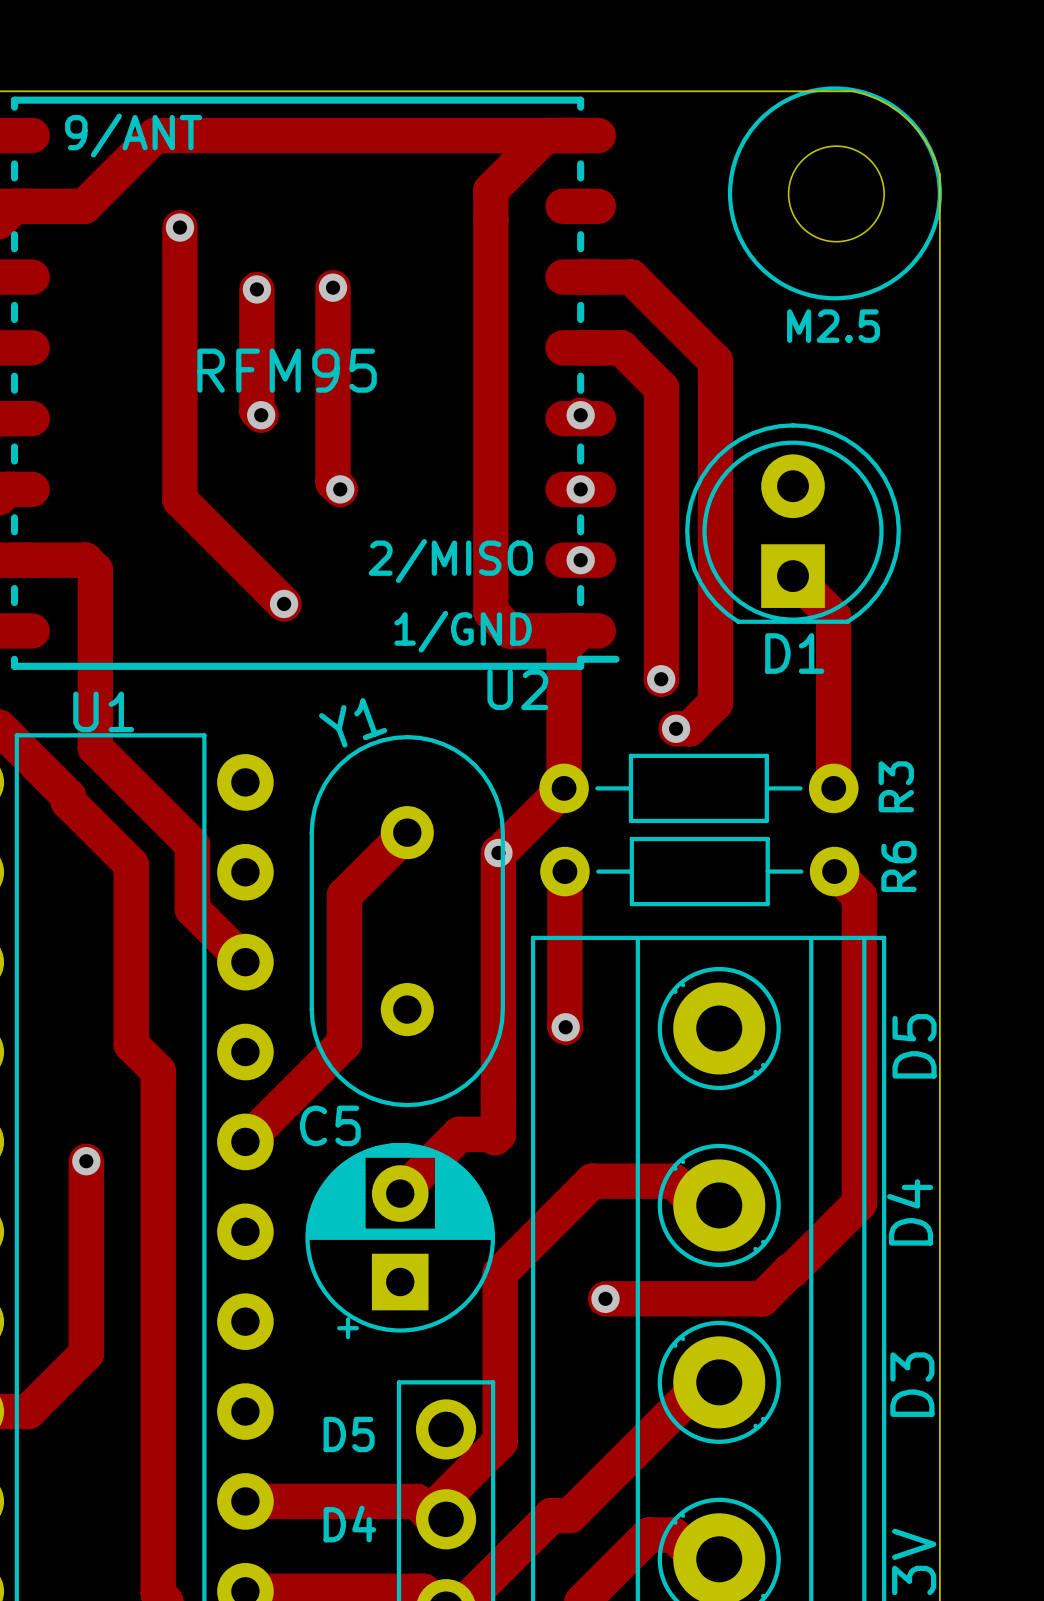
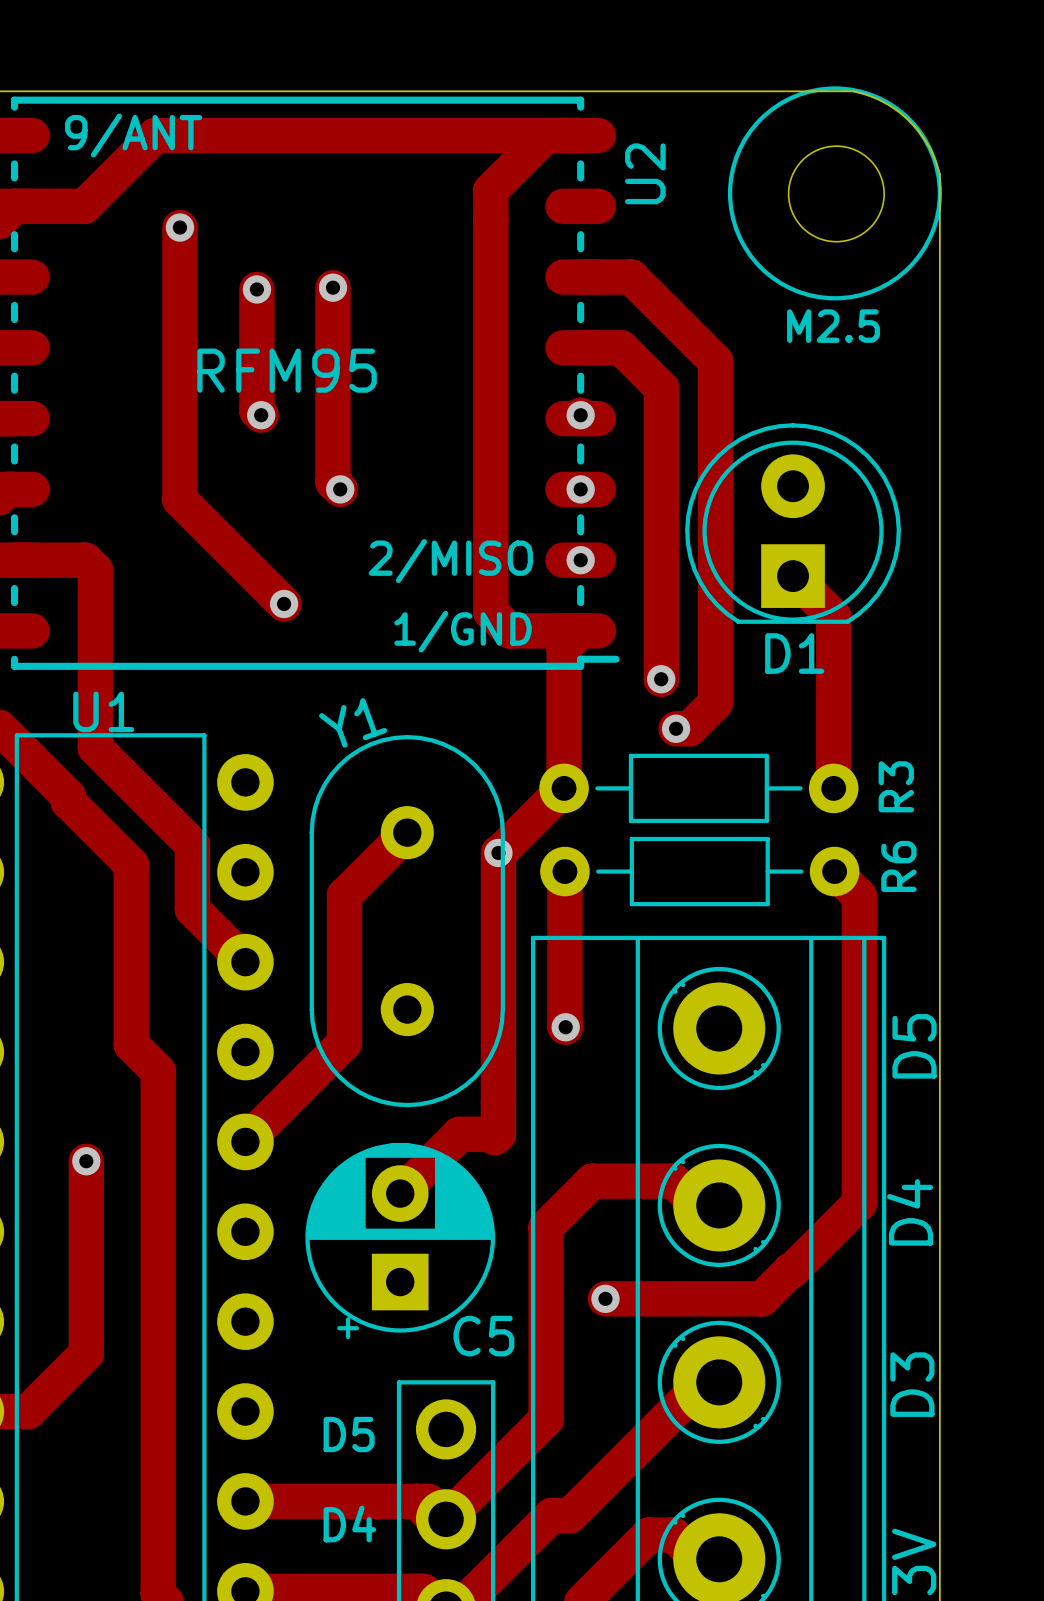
U2 name rotation: 0° (517, 689) -> 90° counterclockwise (645, 173)
U2 name position: U2 (517, 689) -> U2 (645, 173)
C5 name position: C5 (330, 1125) -> C5 (483, 1336)
track: (546, 1227) (500, 1273) (500, 1441) (428, 1513) -> (546, 1227) (546, 1419) (446, 1519) (428, 1501) (416, 1501)

